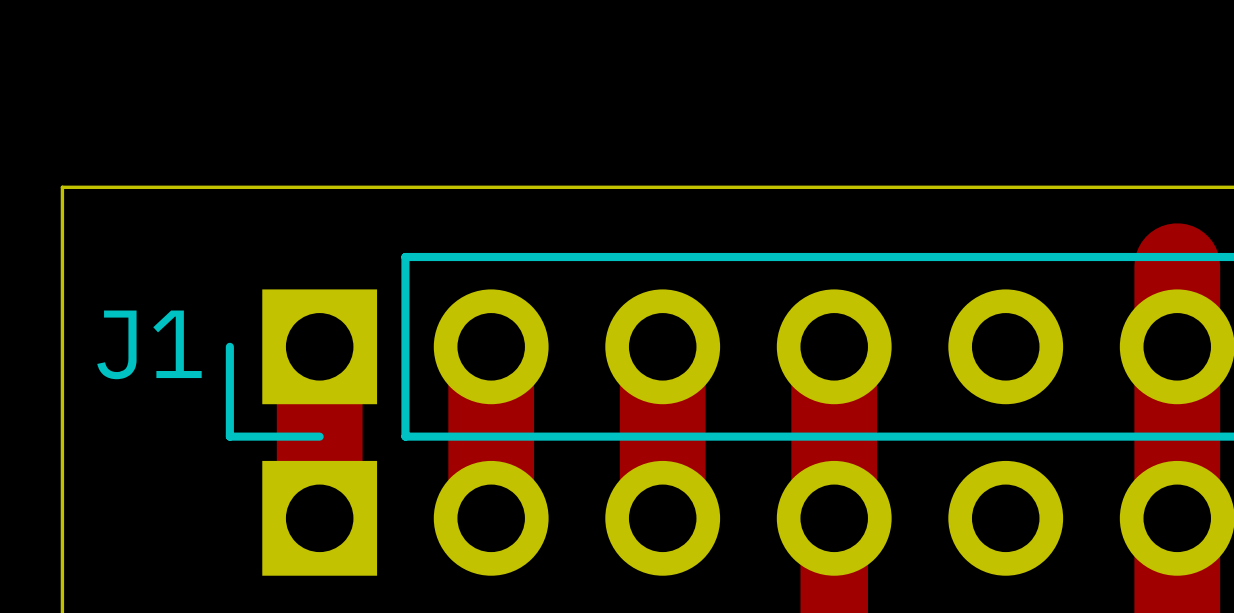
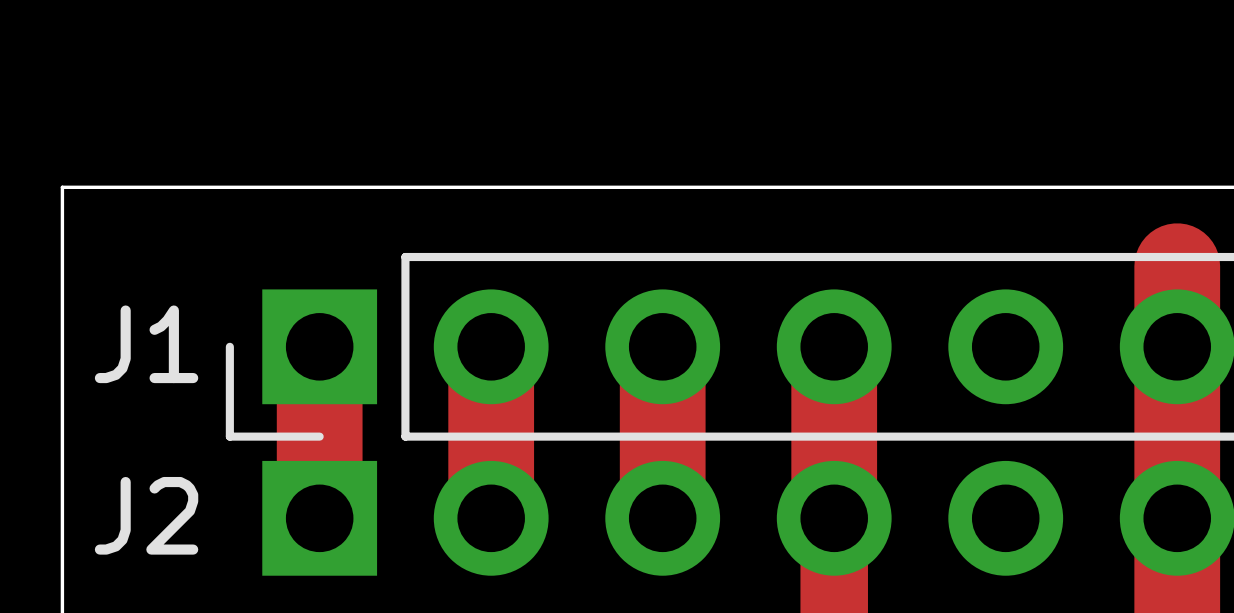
J2 name: none -> J2 (146, 515)

